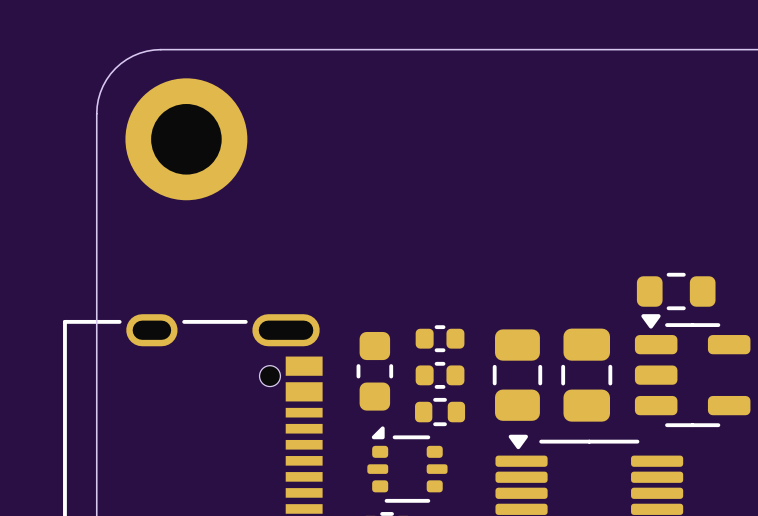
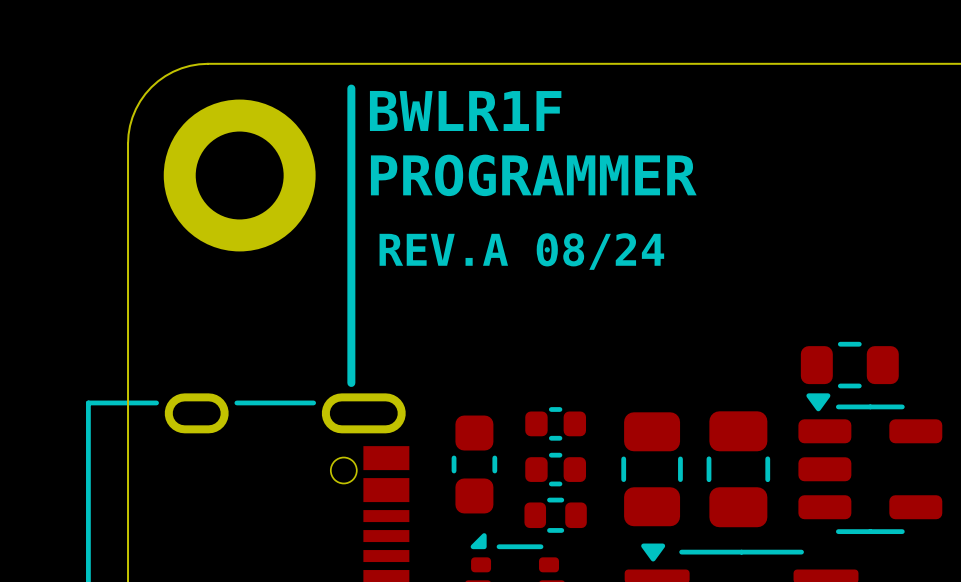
line: none -> (351, 88) (351, 382)
text: none -> BWLR1F (465, 110)
text: none -> PROGRAMMER (533, 175)
text: none -> REV.A (443, 249)
text: none -> 08/24 (600, 251)

